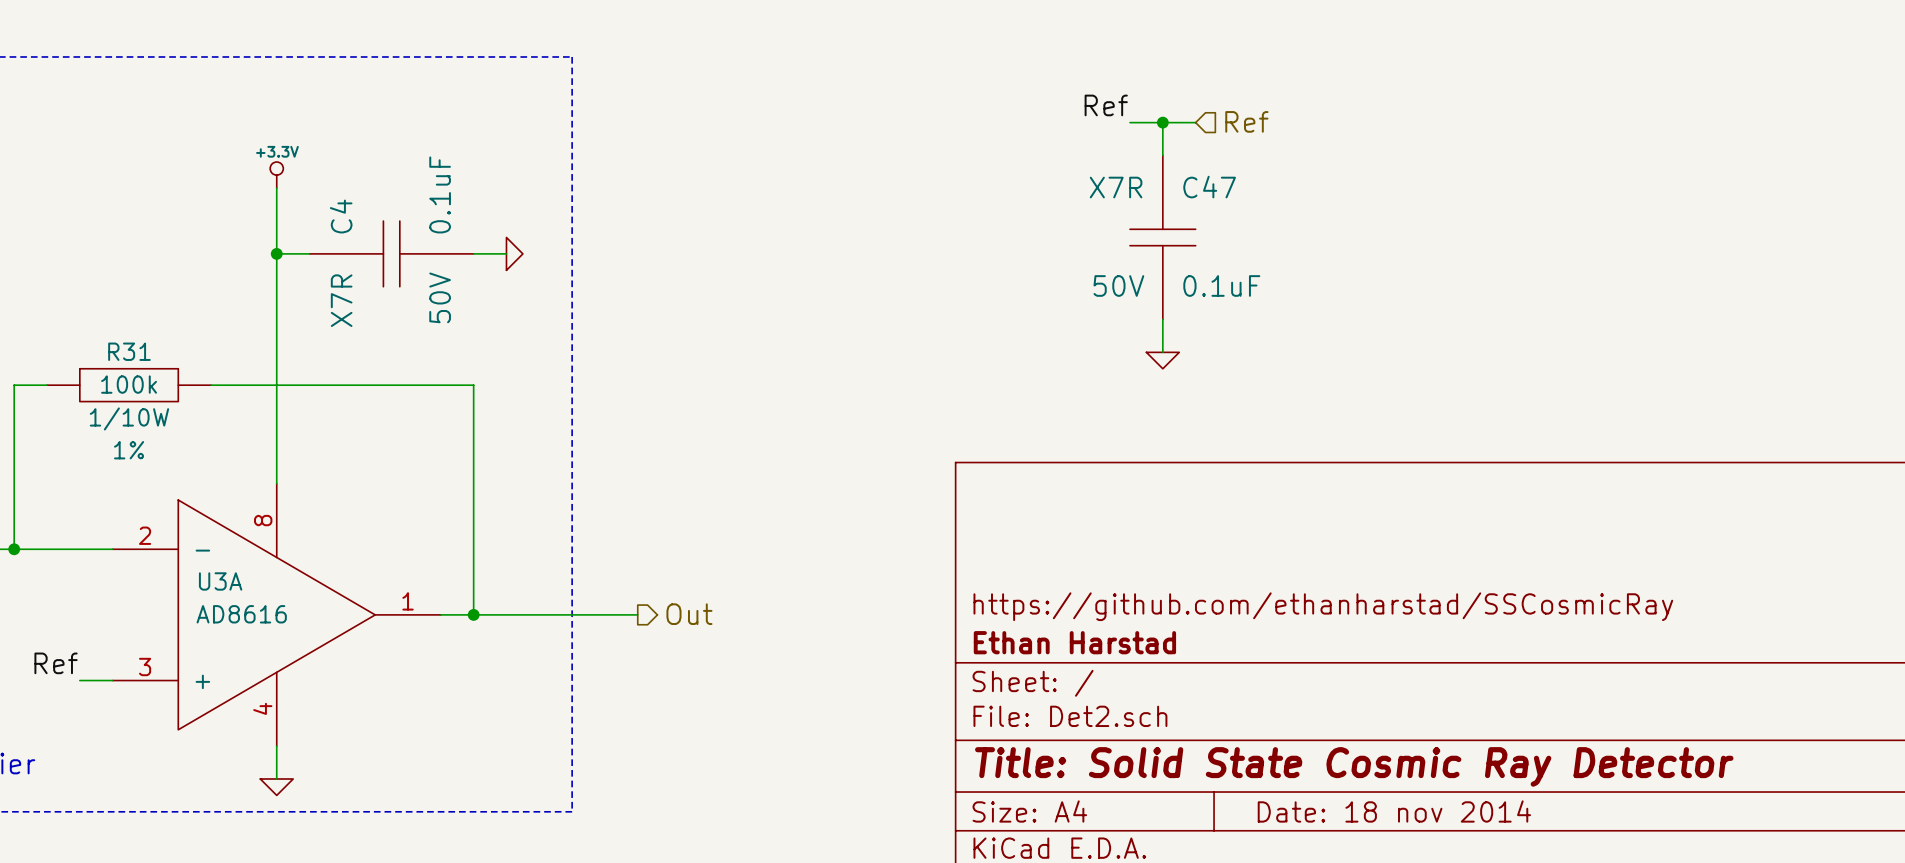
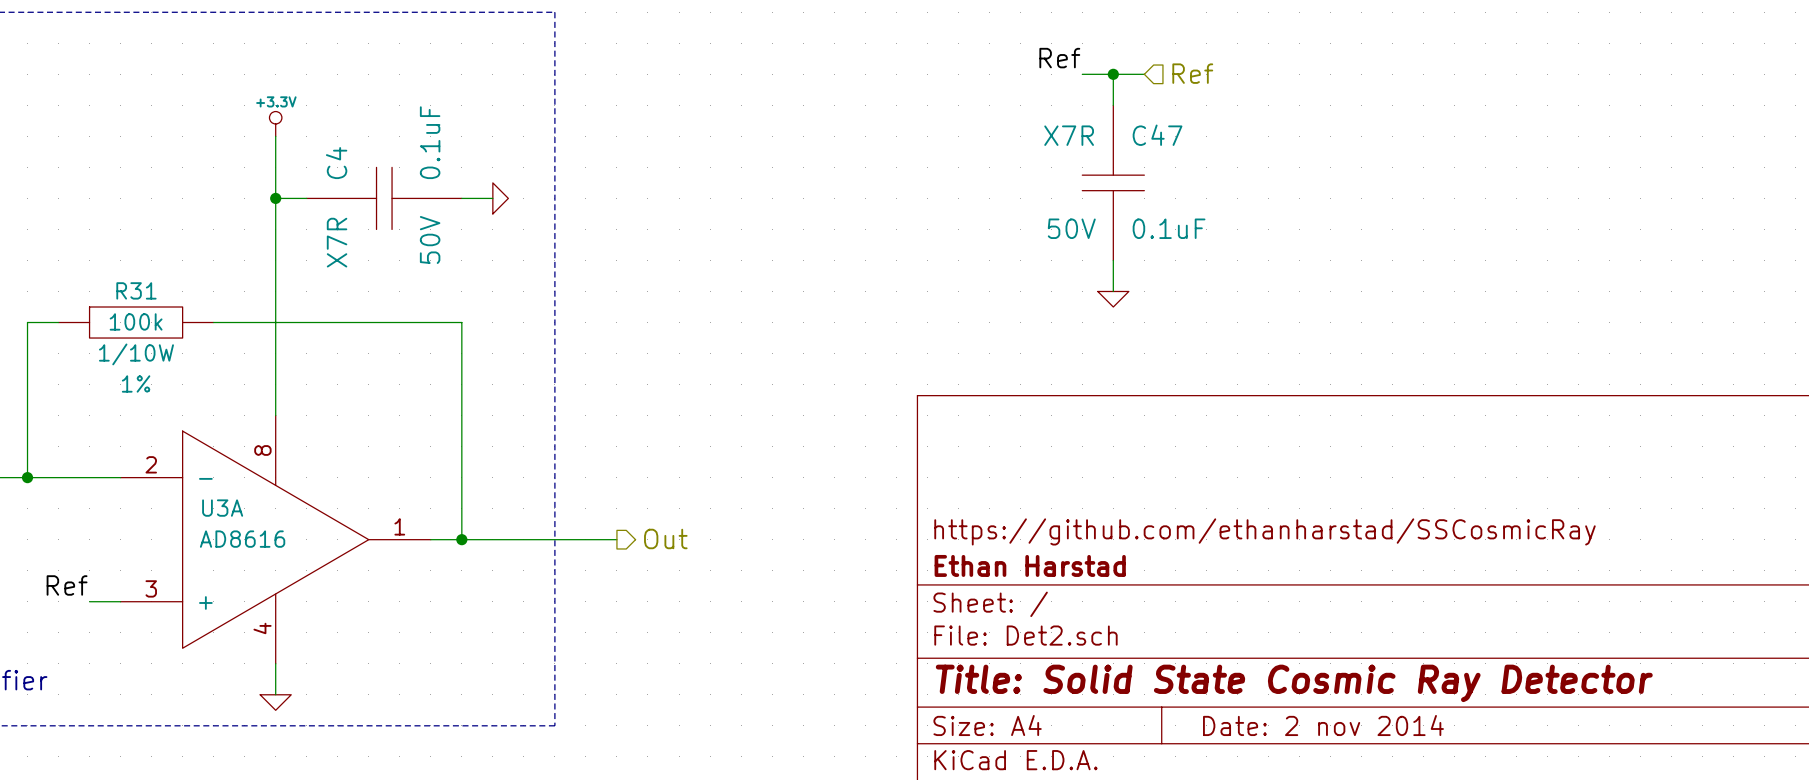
title block: Date: 18 nov 2014 (1394, 811) -> Date: 2 nov 2014 (1323, 725)

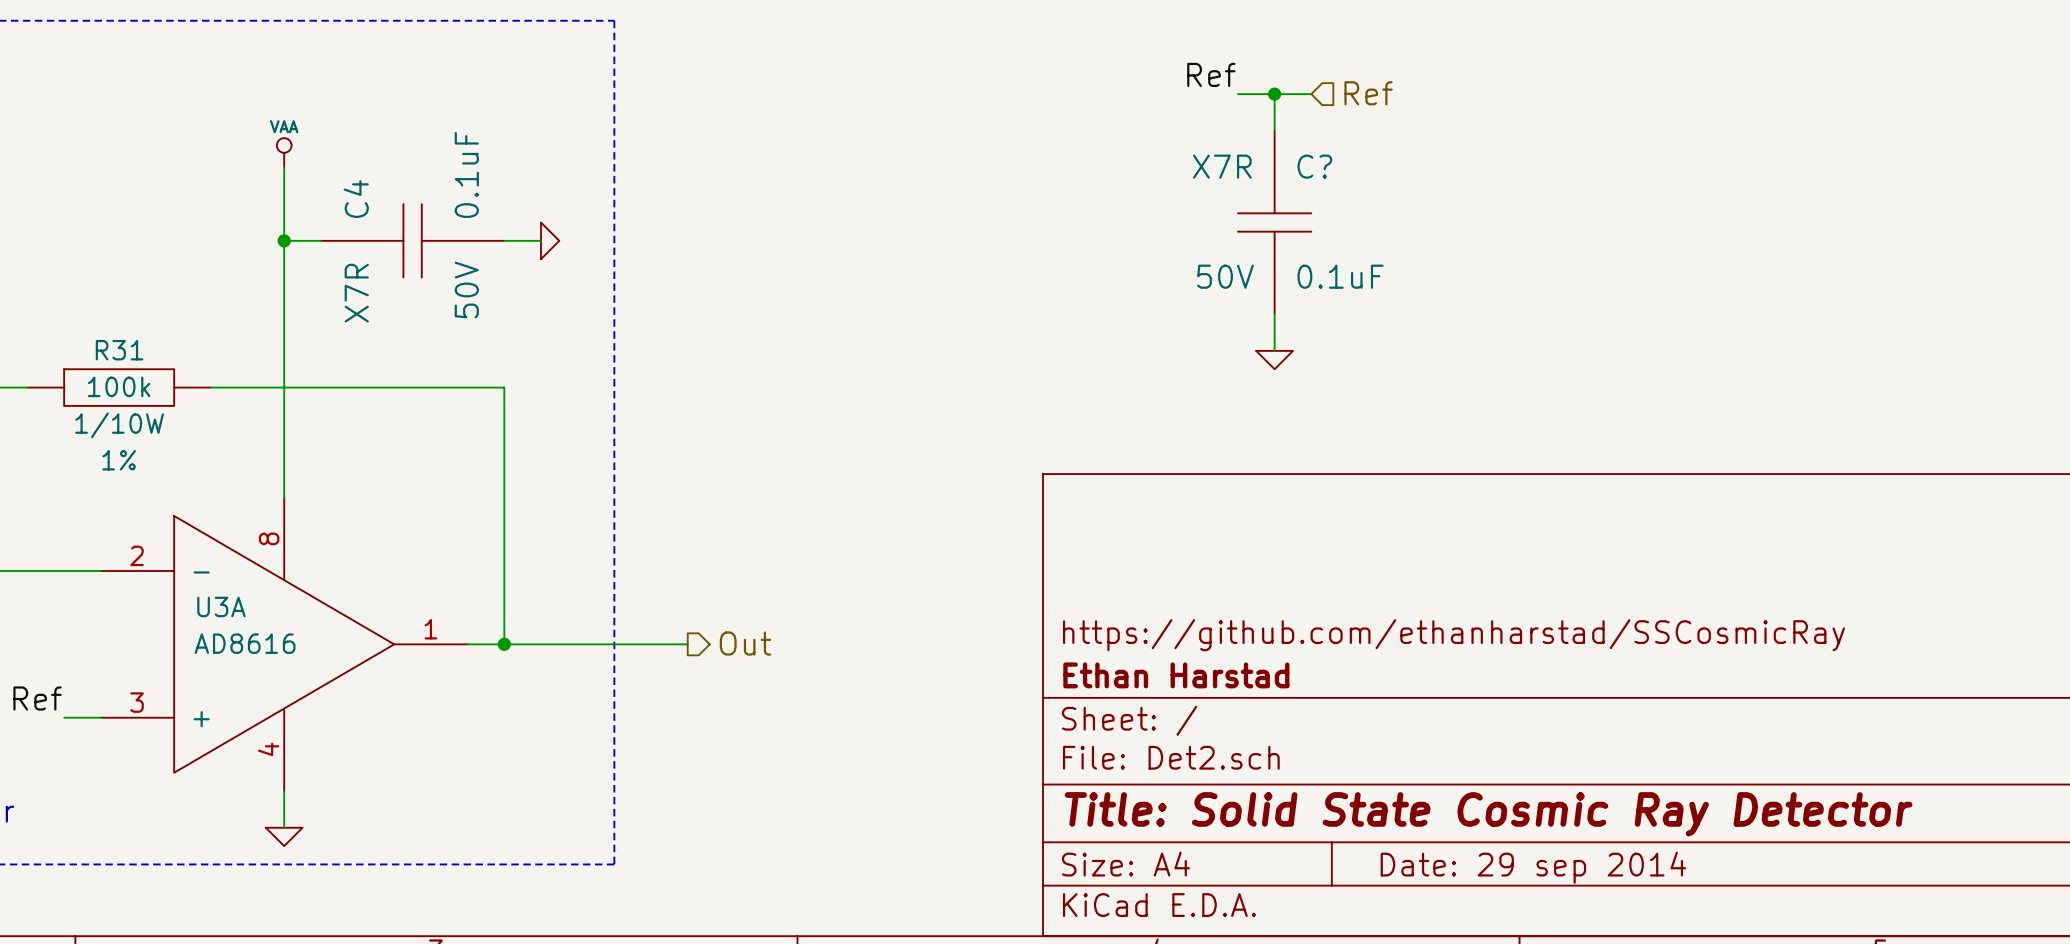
power symbol: +3.3V (275, 123) -> VAA (284, 152)
C47 name: C47 (1157, 135) -> C? (1314, 166)
title block: Date: 2 nov 2014 (1323, 725) -> Date: 29 sep 2014 (1533, 867)

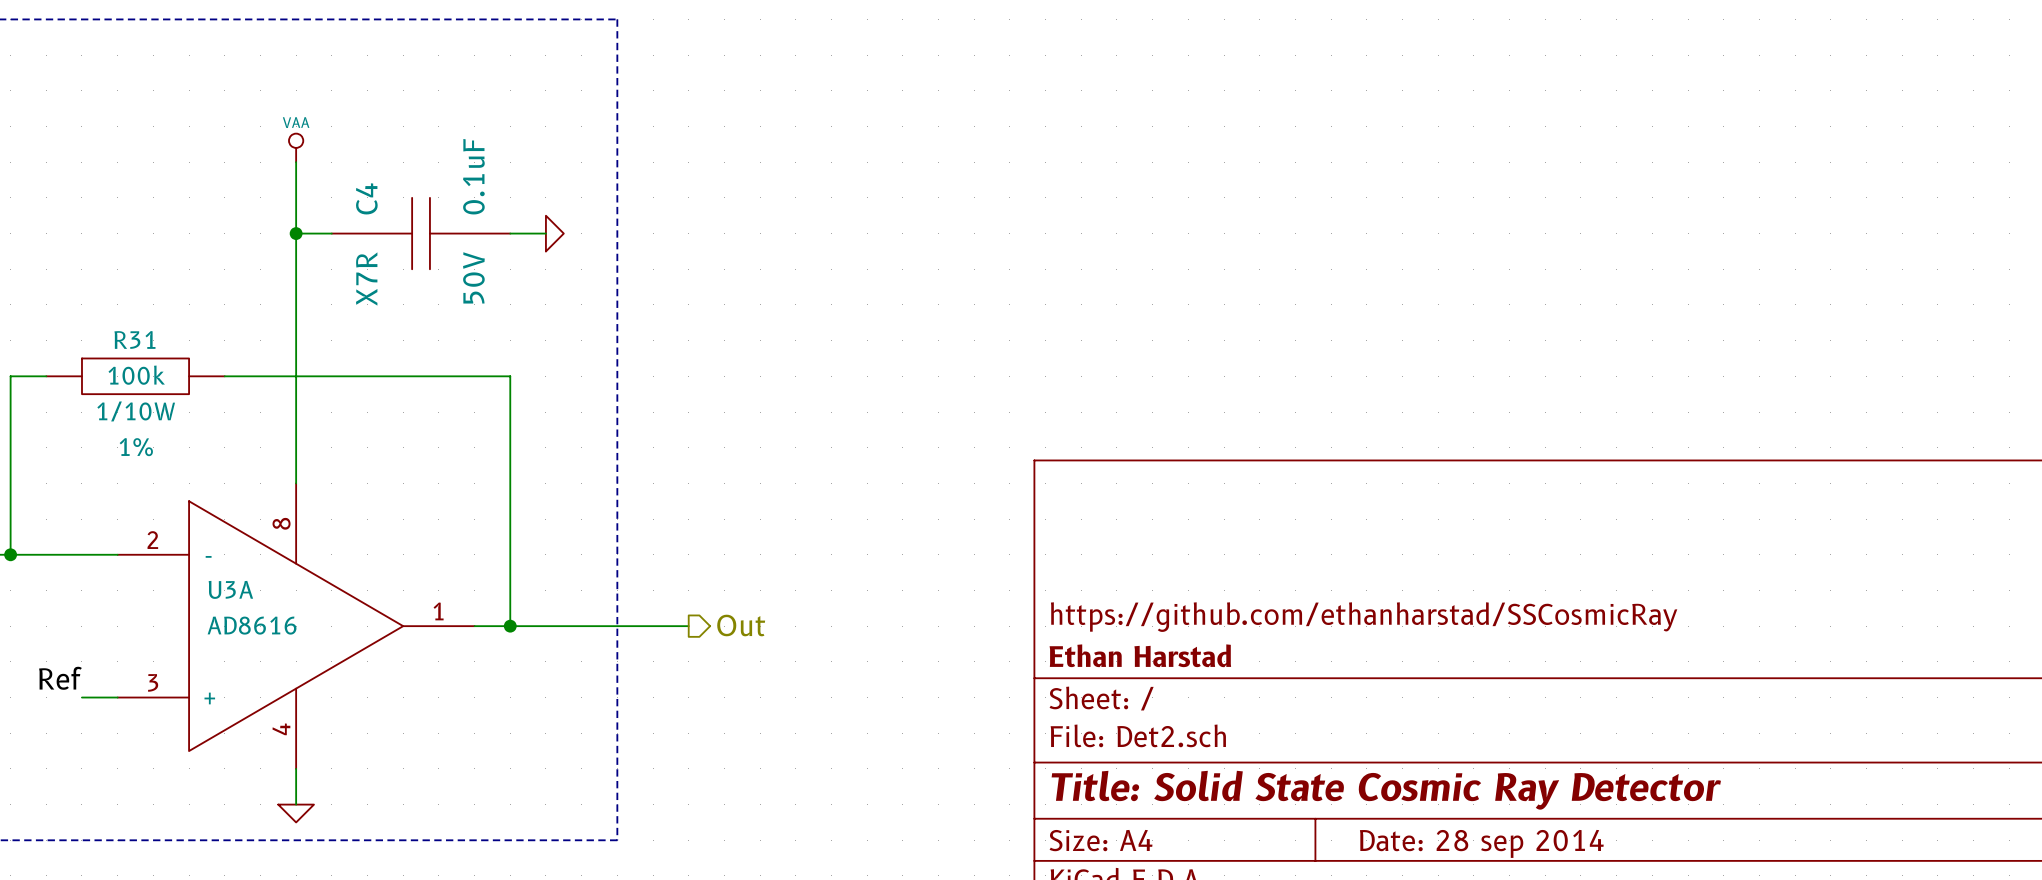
label: Ref (1211, 74) -> none
hierarchical label: Ref (1368, 93) -> none
wire: (1237, 94) (1311, 94) -> none
wire: (1274, 94) (1274, 130) -> none
junction: (1274, 94) -> none
C?: 0.1uF (1274, 222) -> none
wire: (1274, 314) (1274, 350) -> none
power symbol: (1274, 360) -> none
title block: Date: 29 sep 2014 (1533, 867) -> Date: 28 sep 2014 (1481, 843)

